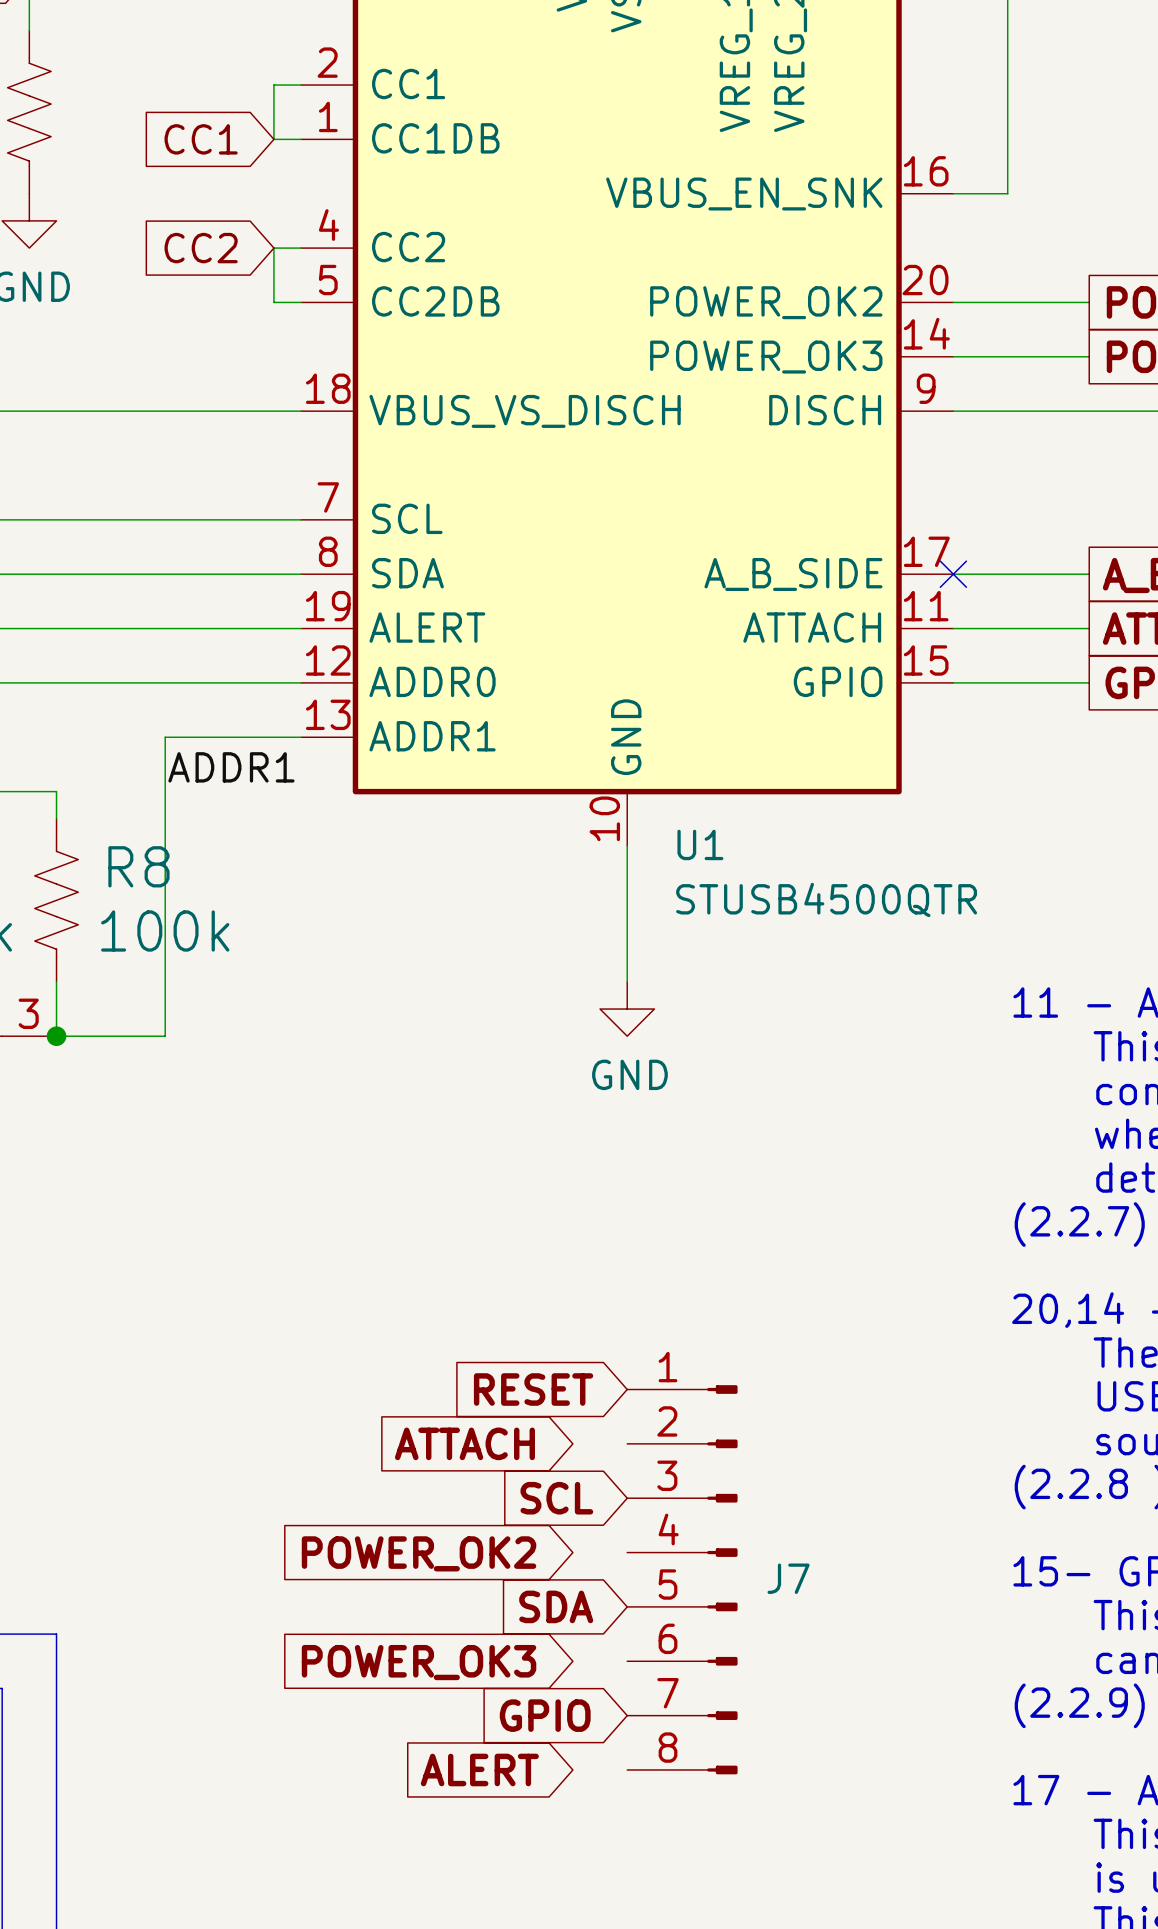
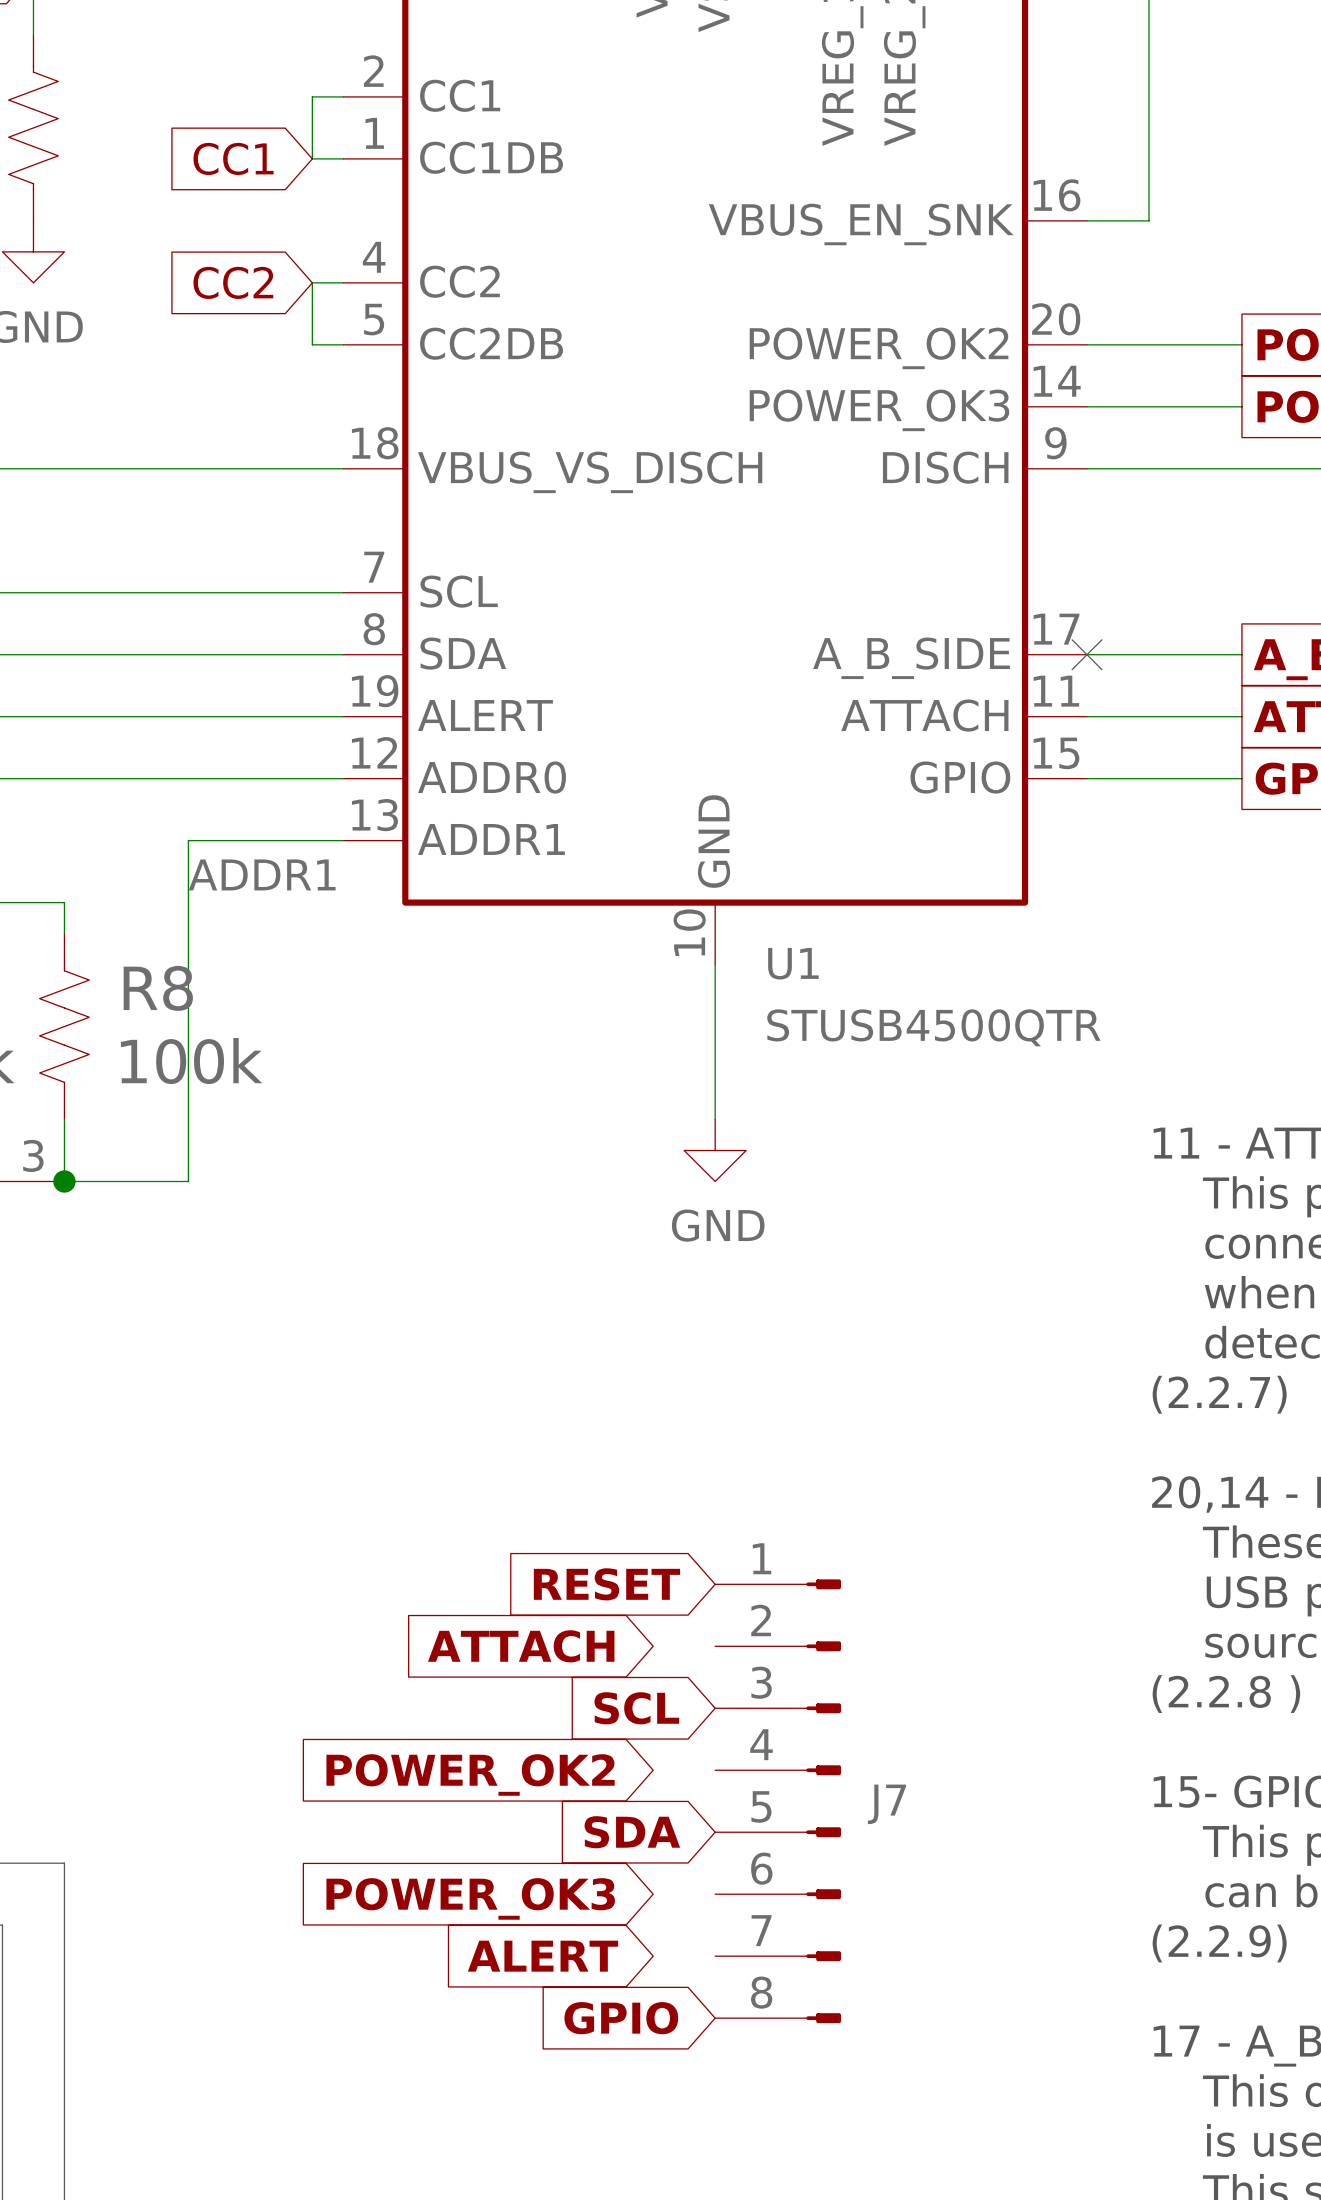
global label position: GPIO (545, 1715) -> GPIO (621, 2018)
global label position: ALERT (479, 1769) -> ALERT (542, 1956)

